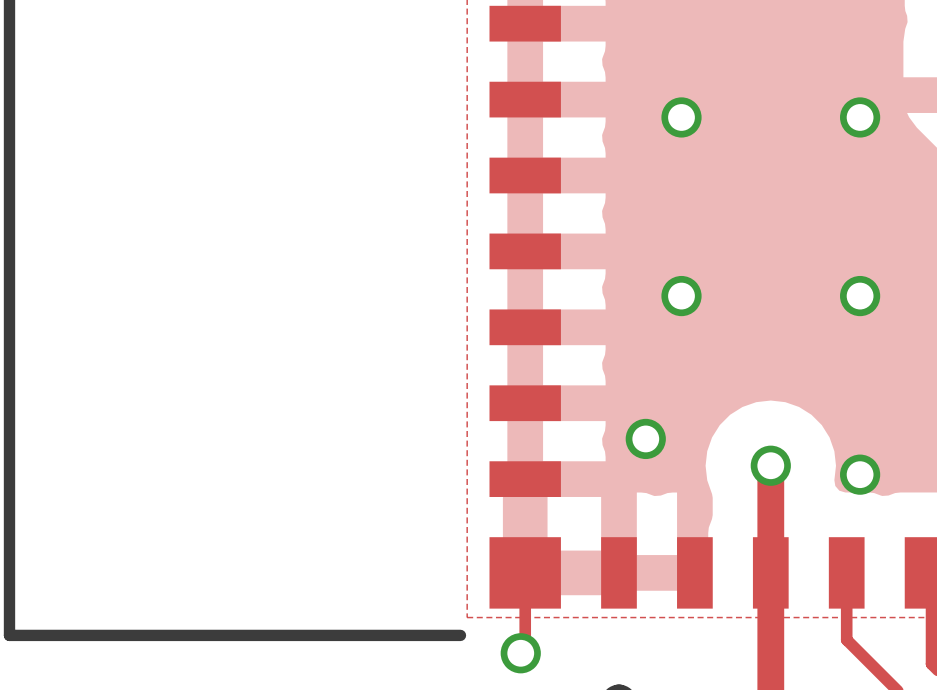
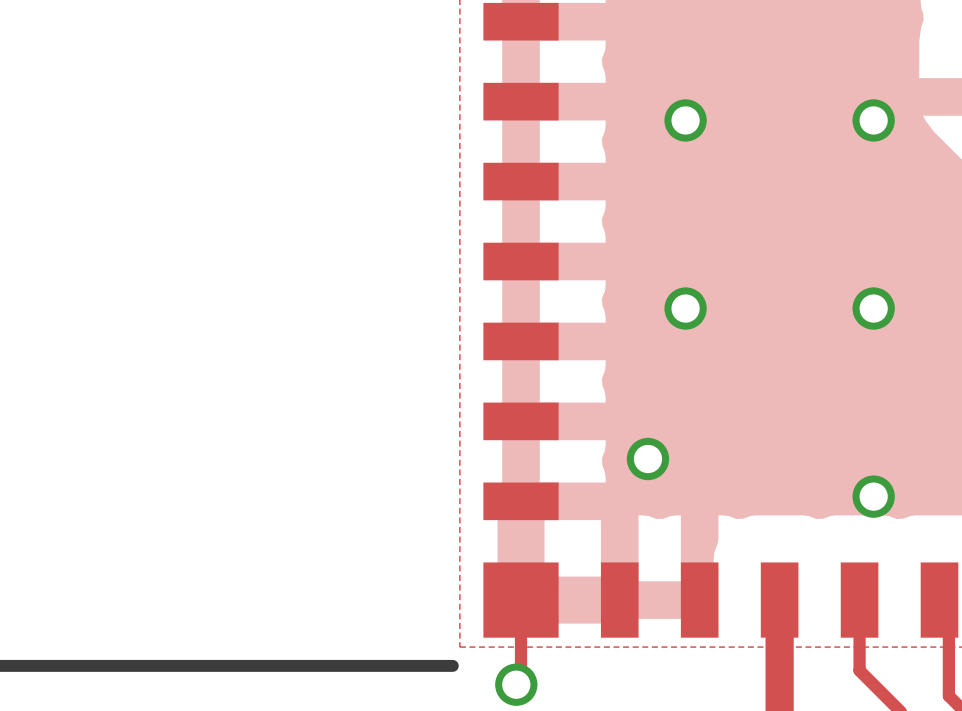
track: (770, 465) (770, 572) -> none
via: (770, 465) -> none

